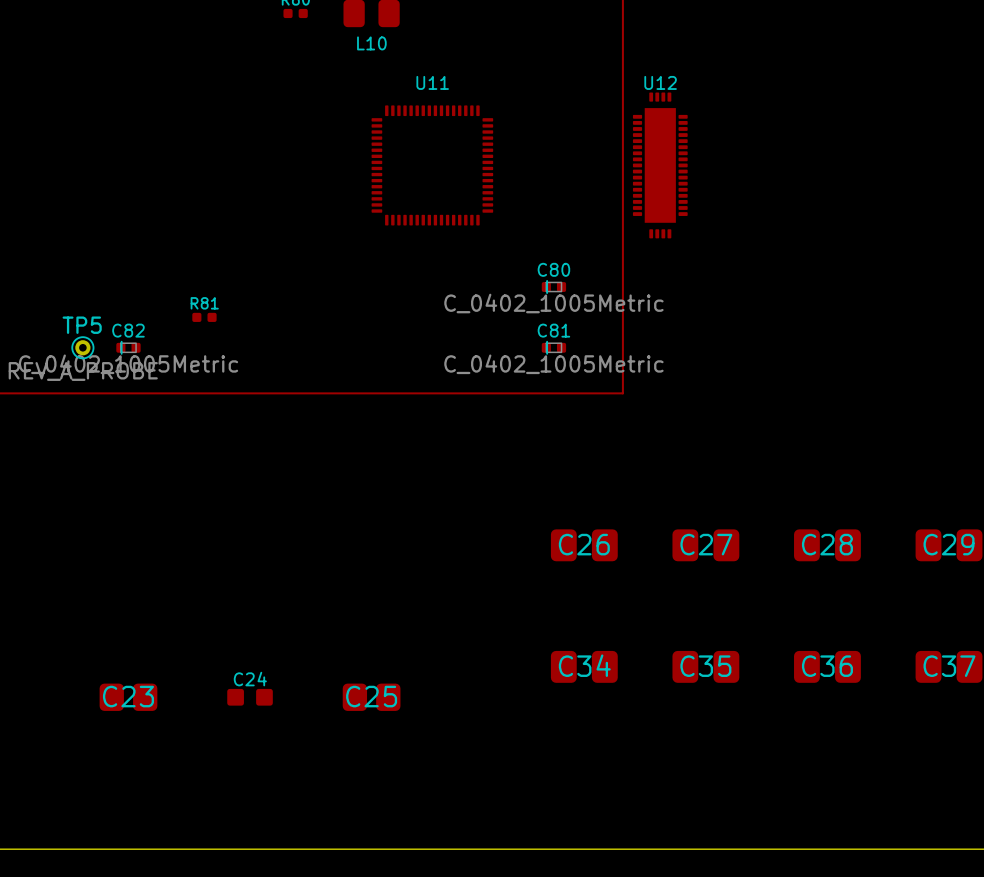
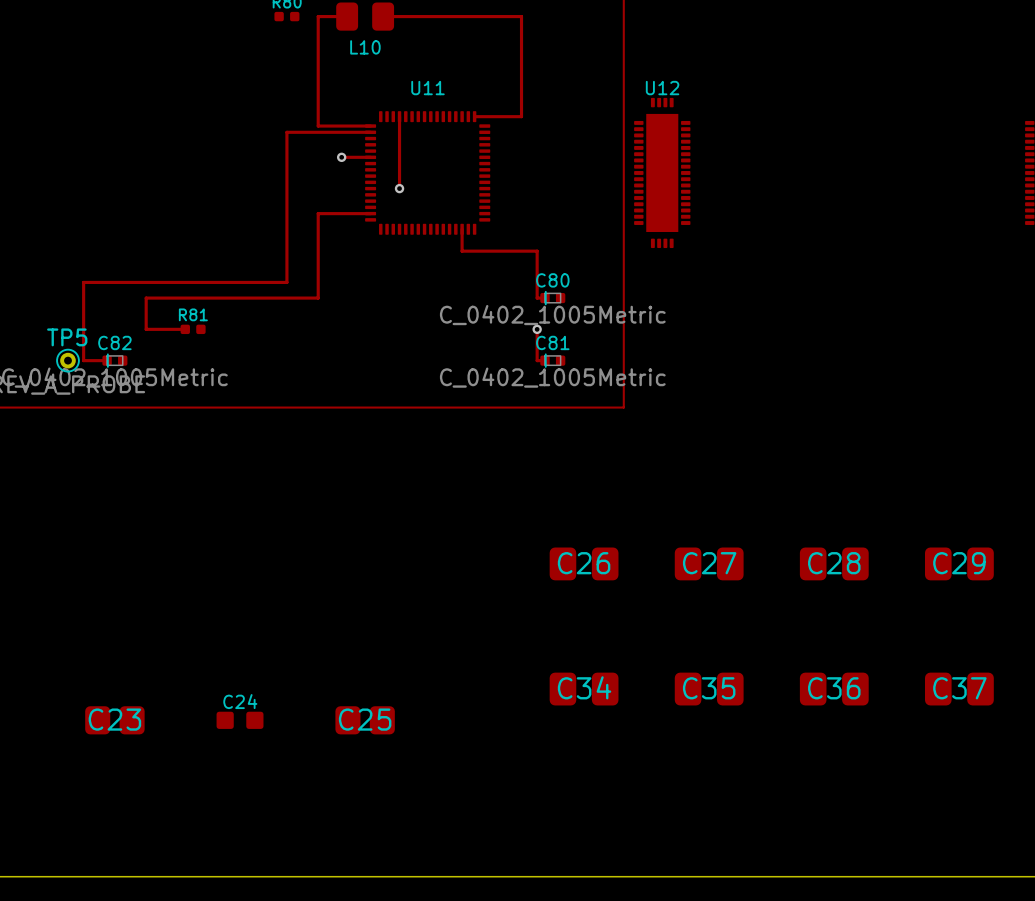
track: none -> (347, 16) (318, 16) (318, 126) (370, 126)
track: none -> (383, 16) (521, 16) (521, 116) (474, 116)
track: none -> (399, 116) (399, 188)
track: none -> (370, 132) (286, 132) (286, 282) (83, 282) (83, 360) (107, 360)
track: none -> (341, 157) (370, 157)
via: none -> (341, 157)
via: none -> (399, 188)
track: none -> (370, 213) (318, 213) (318, 298) (146, 298) (146, 329) (185, 329)
track: none -> (462, 229) (462, 251) (537, 251) (537, 298) (544, 298)
track: none -> (537, 329) (537, 360) (544, 360)
via: none -> (537, 329)

